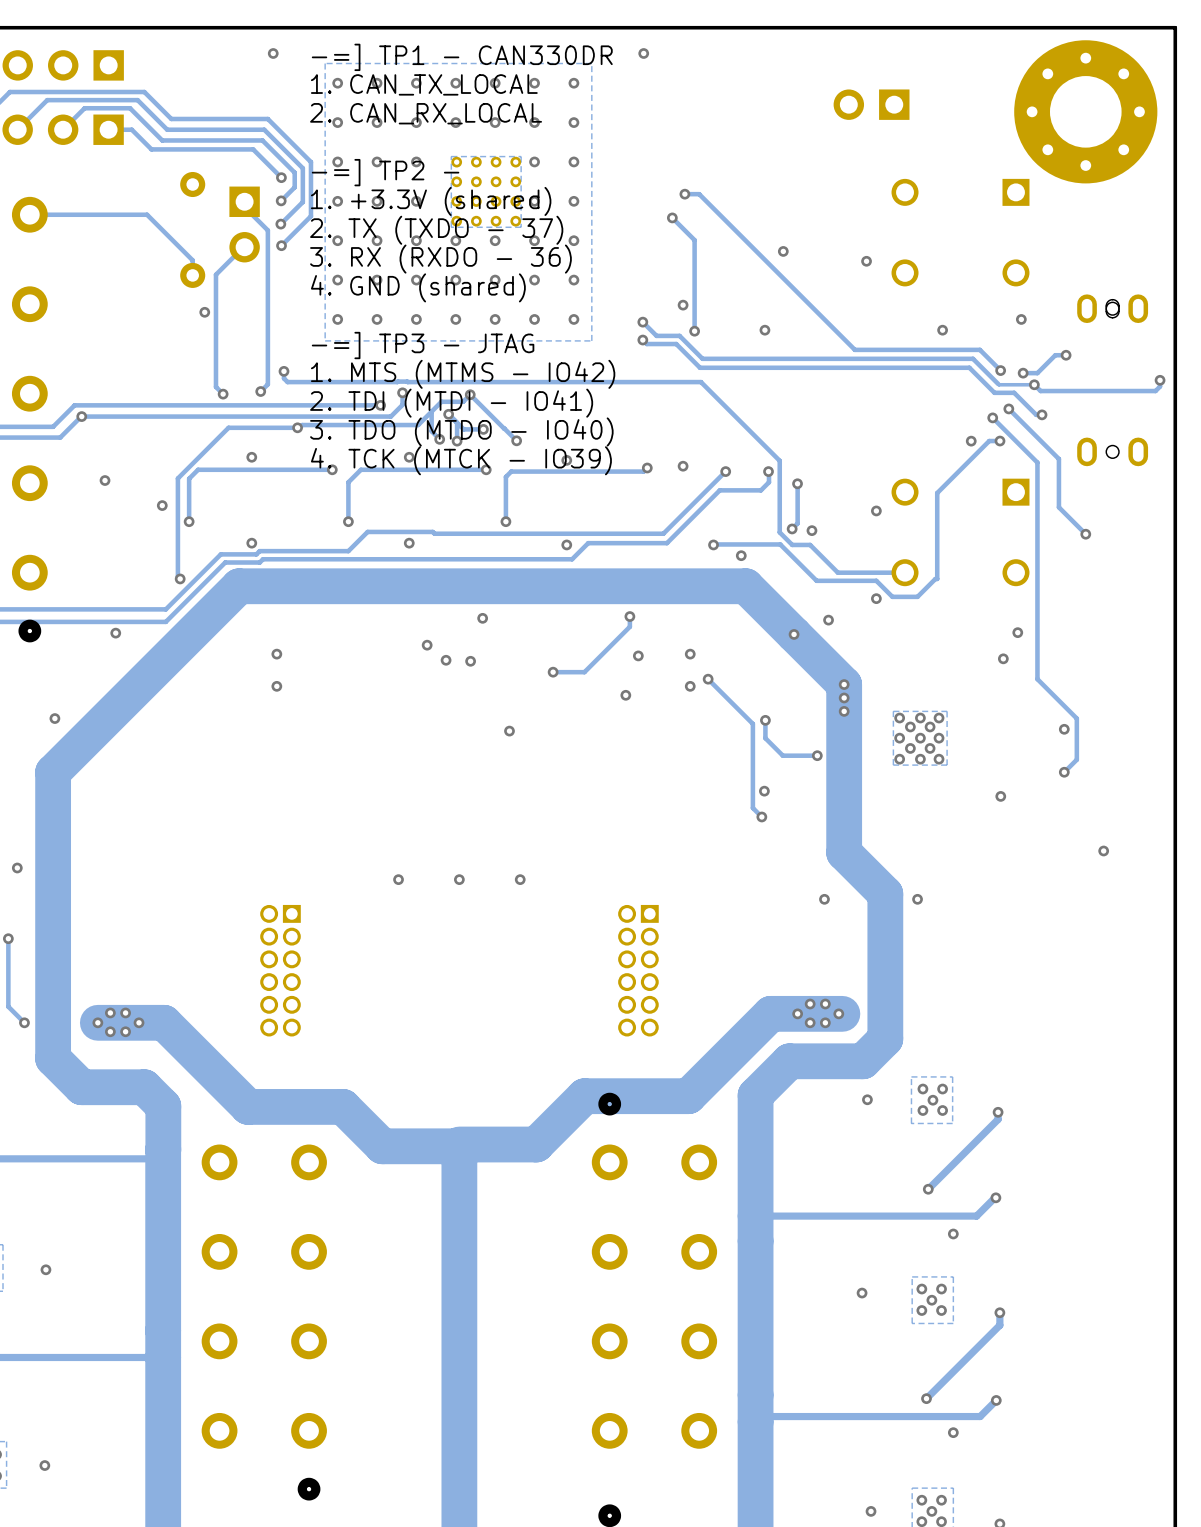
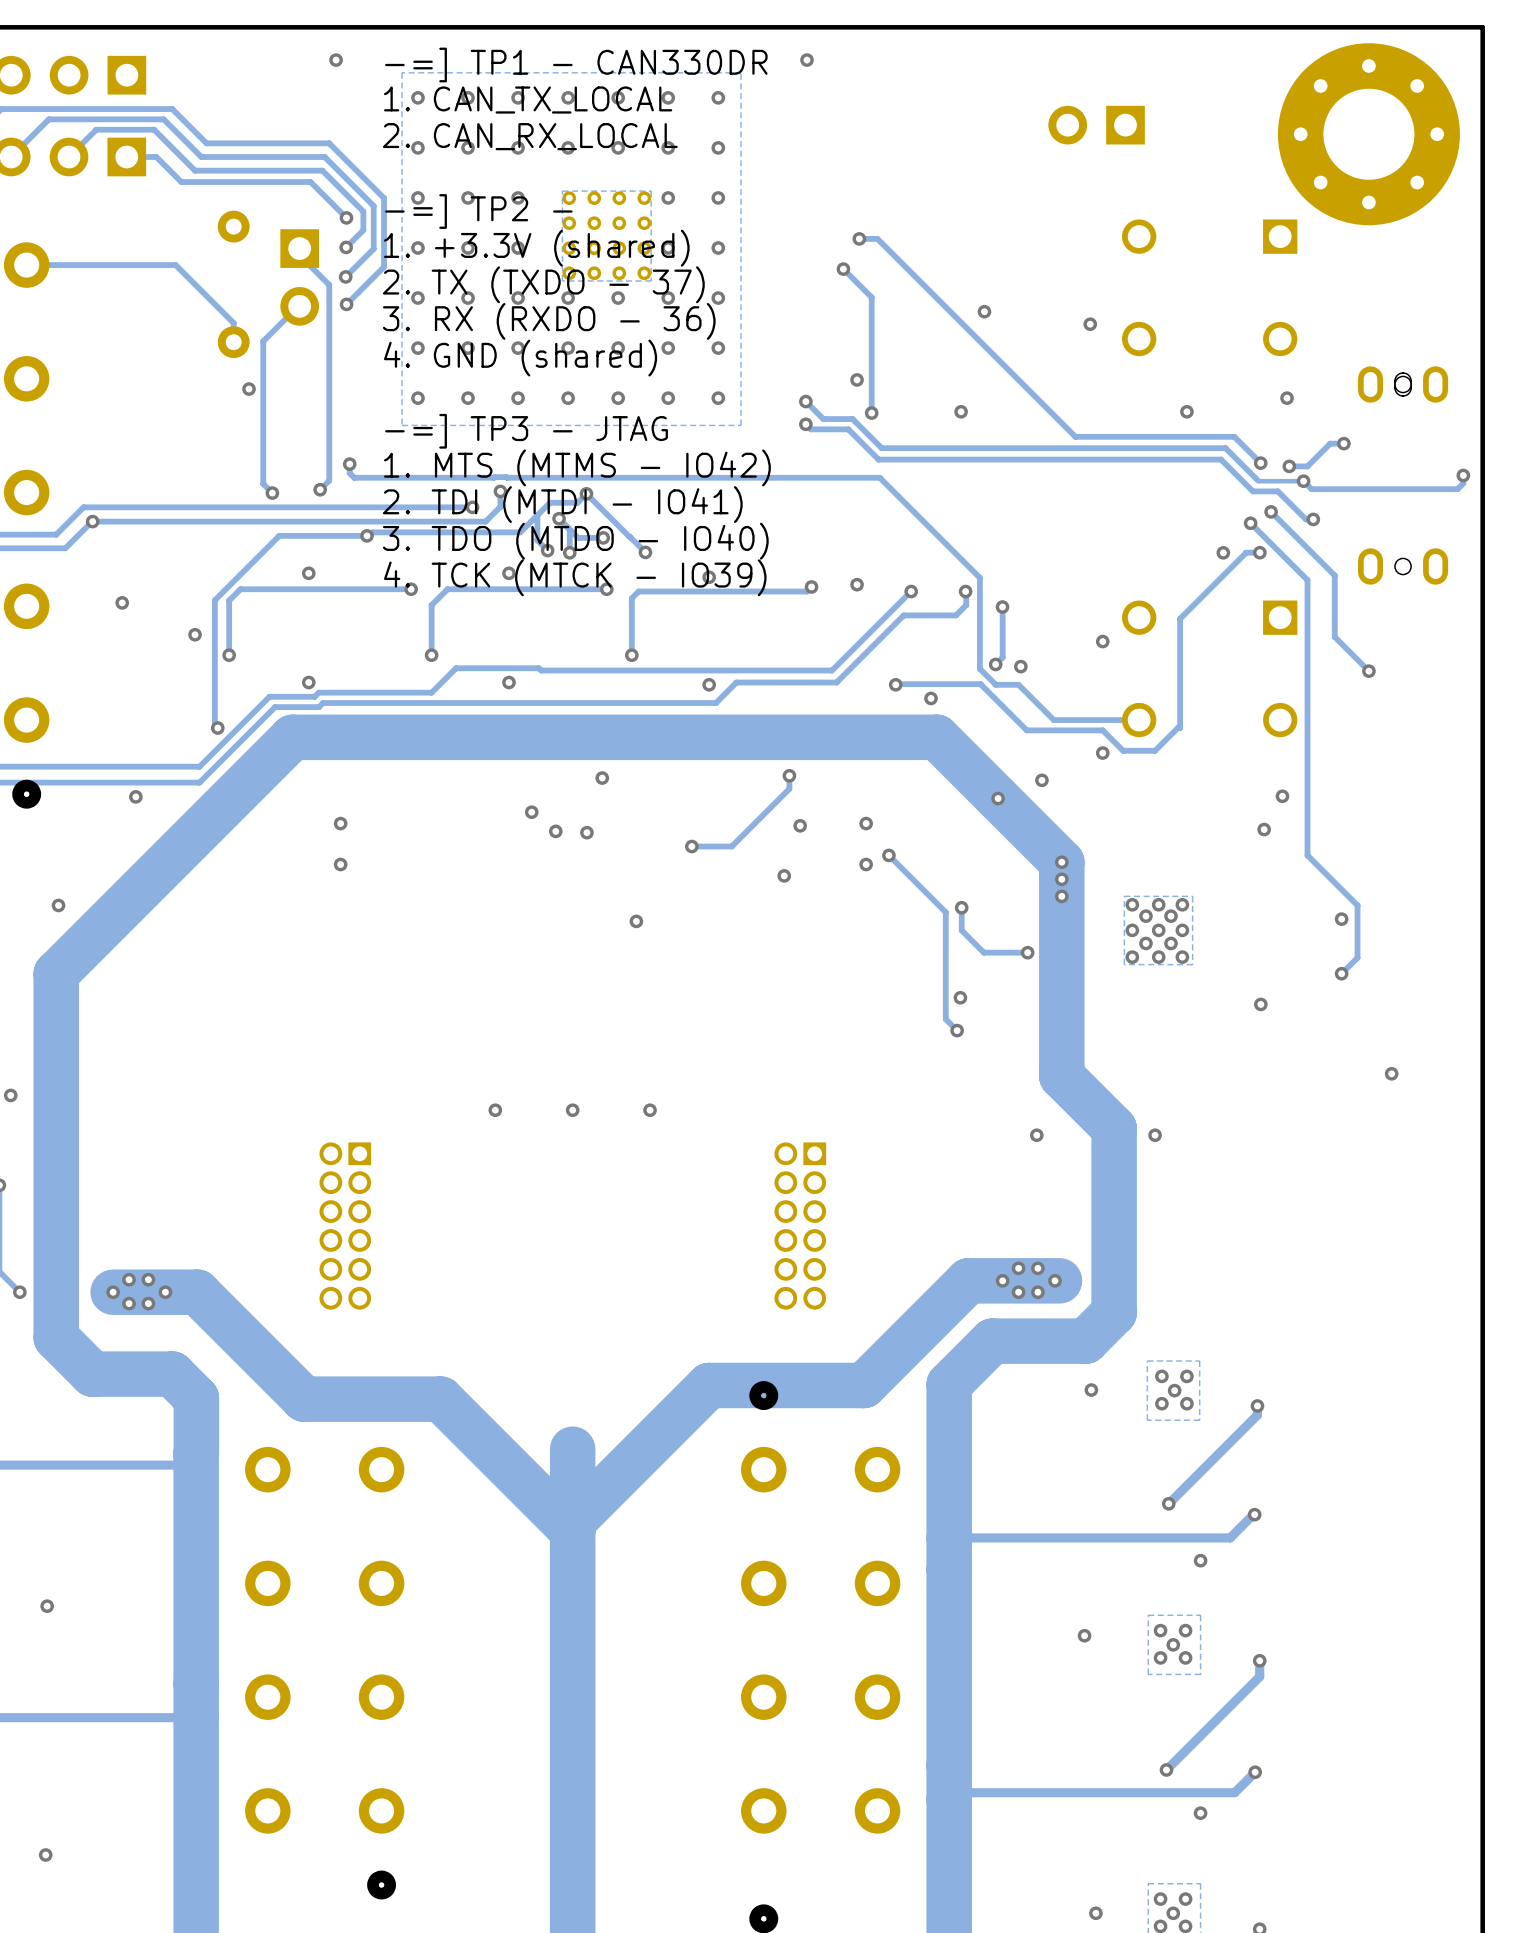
track: (584, 1096) (536, 1144) (382, 1146) (343, 1106) -> (731, 1385) (709, 1385) (568, 1526) (572, 1521)
track: none -> (424, 1399) (440, 1399) (572, 1531)

